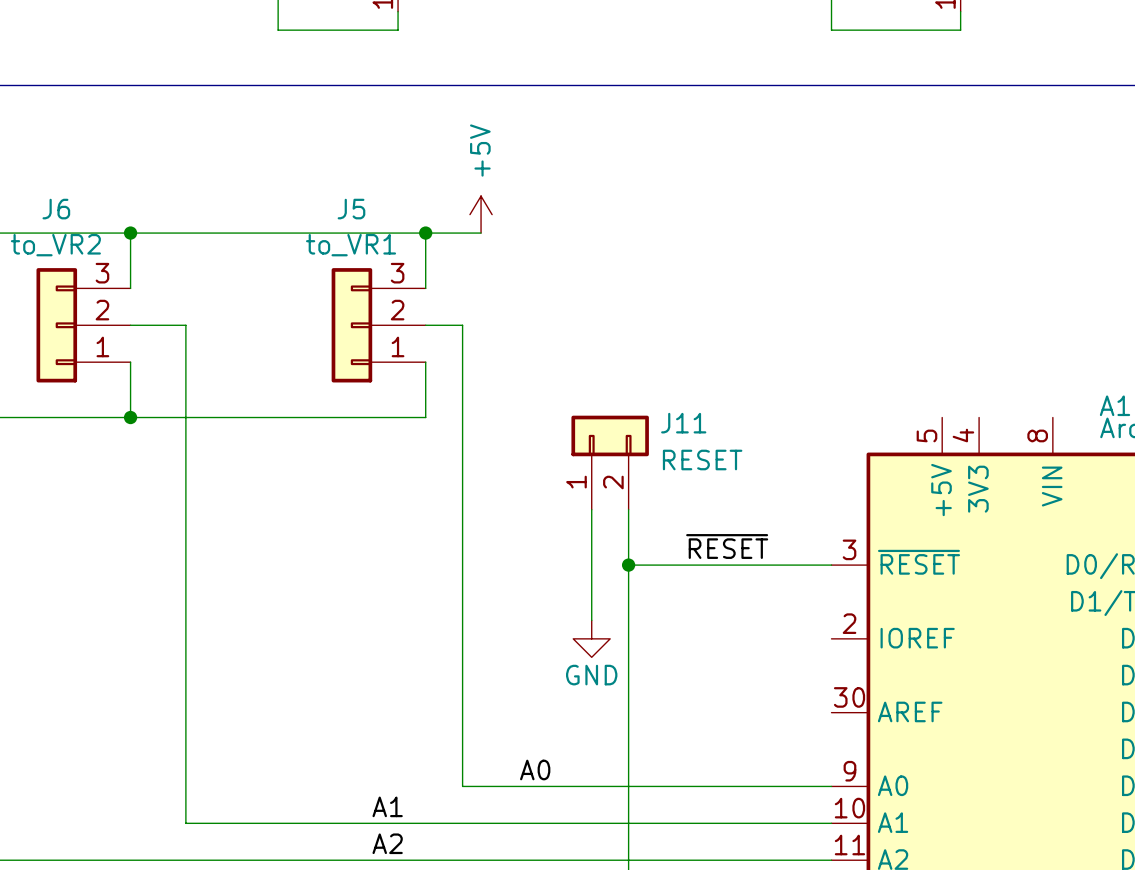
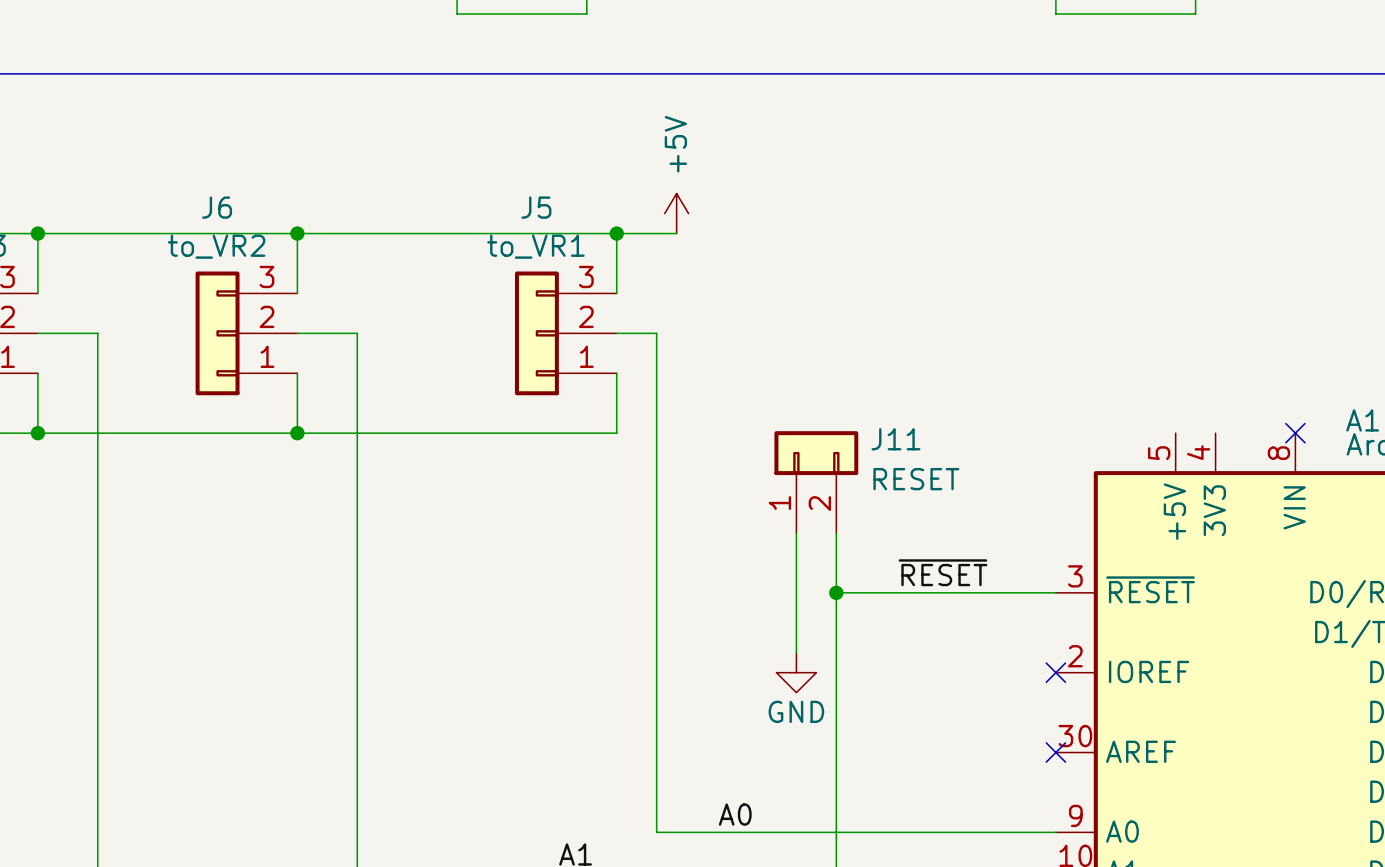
no-connect mark: none -> (1295, 433)
no-connect mark: none -> (1055, 672)
no-connect mark: none -> (1055, 752)

